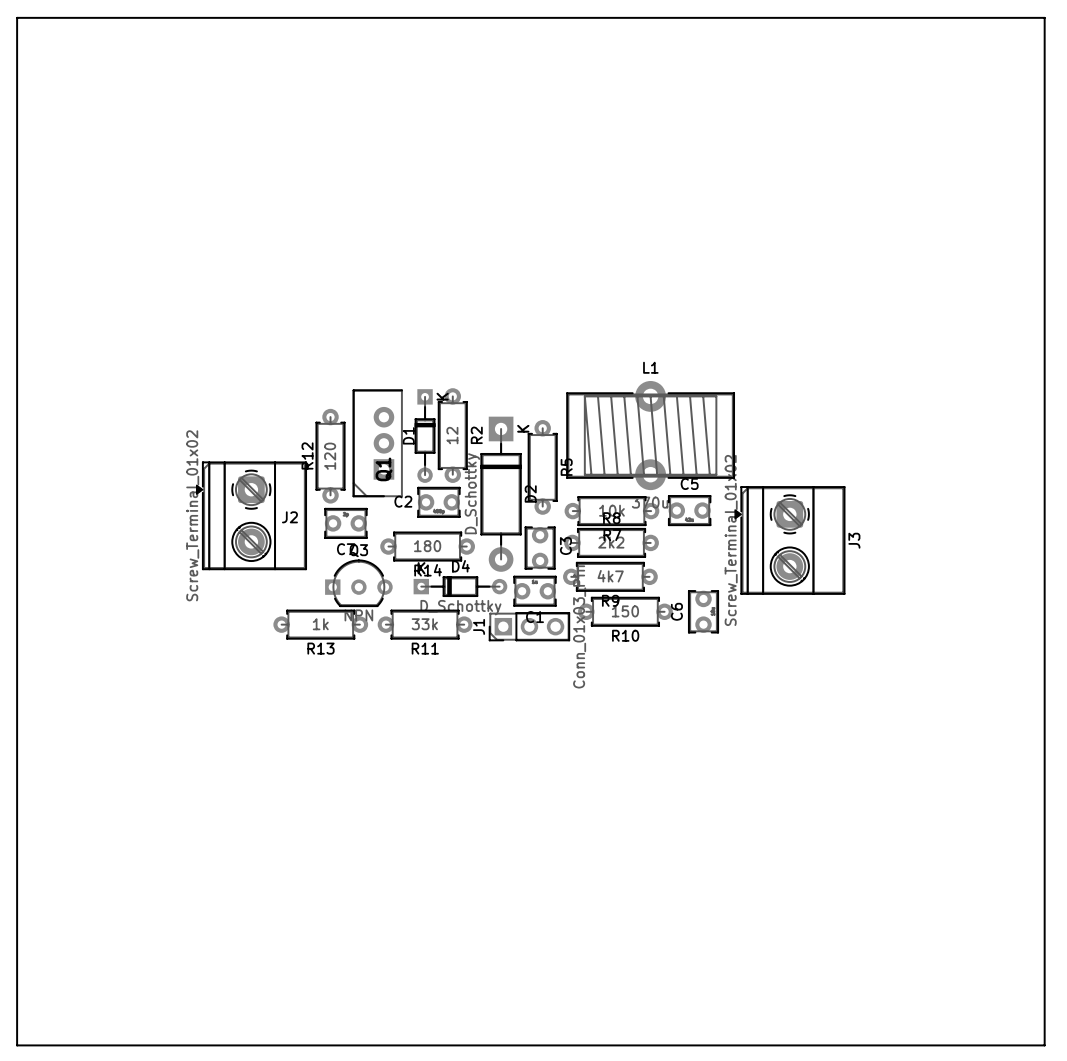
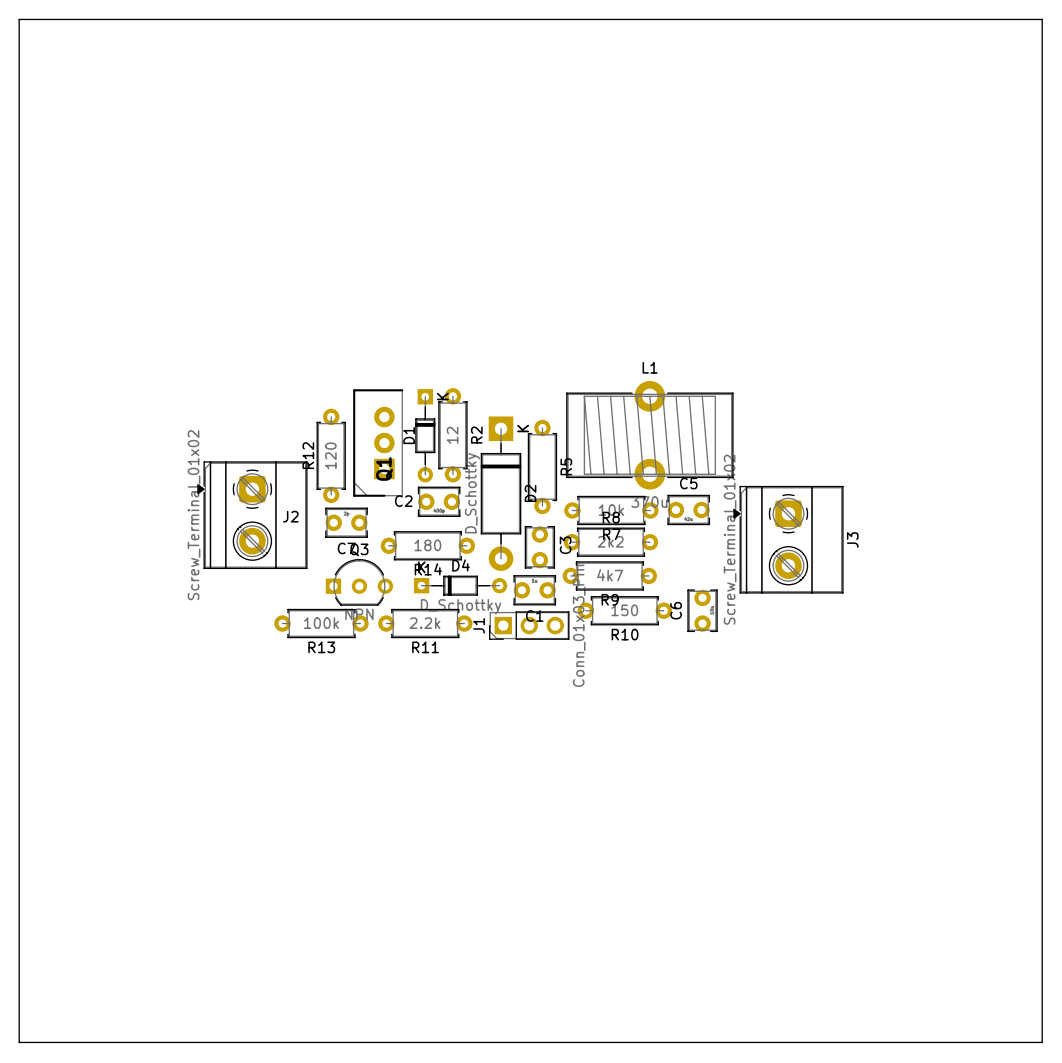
R13 value: 1k (320, 624) -> 100k (321, 623)
R11 value: 33k (424, 624) -> 2.2k (425, 623)

